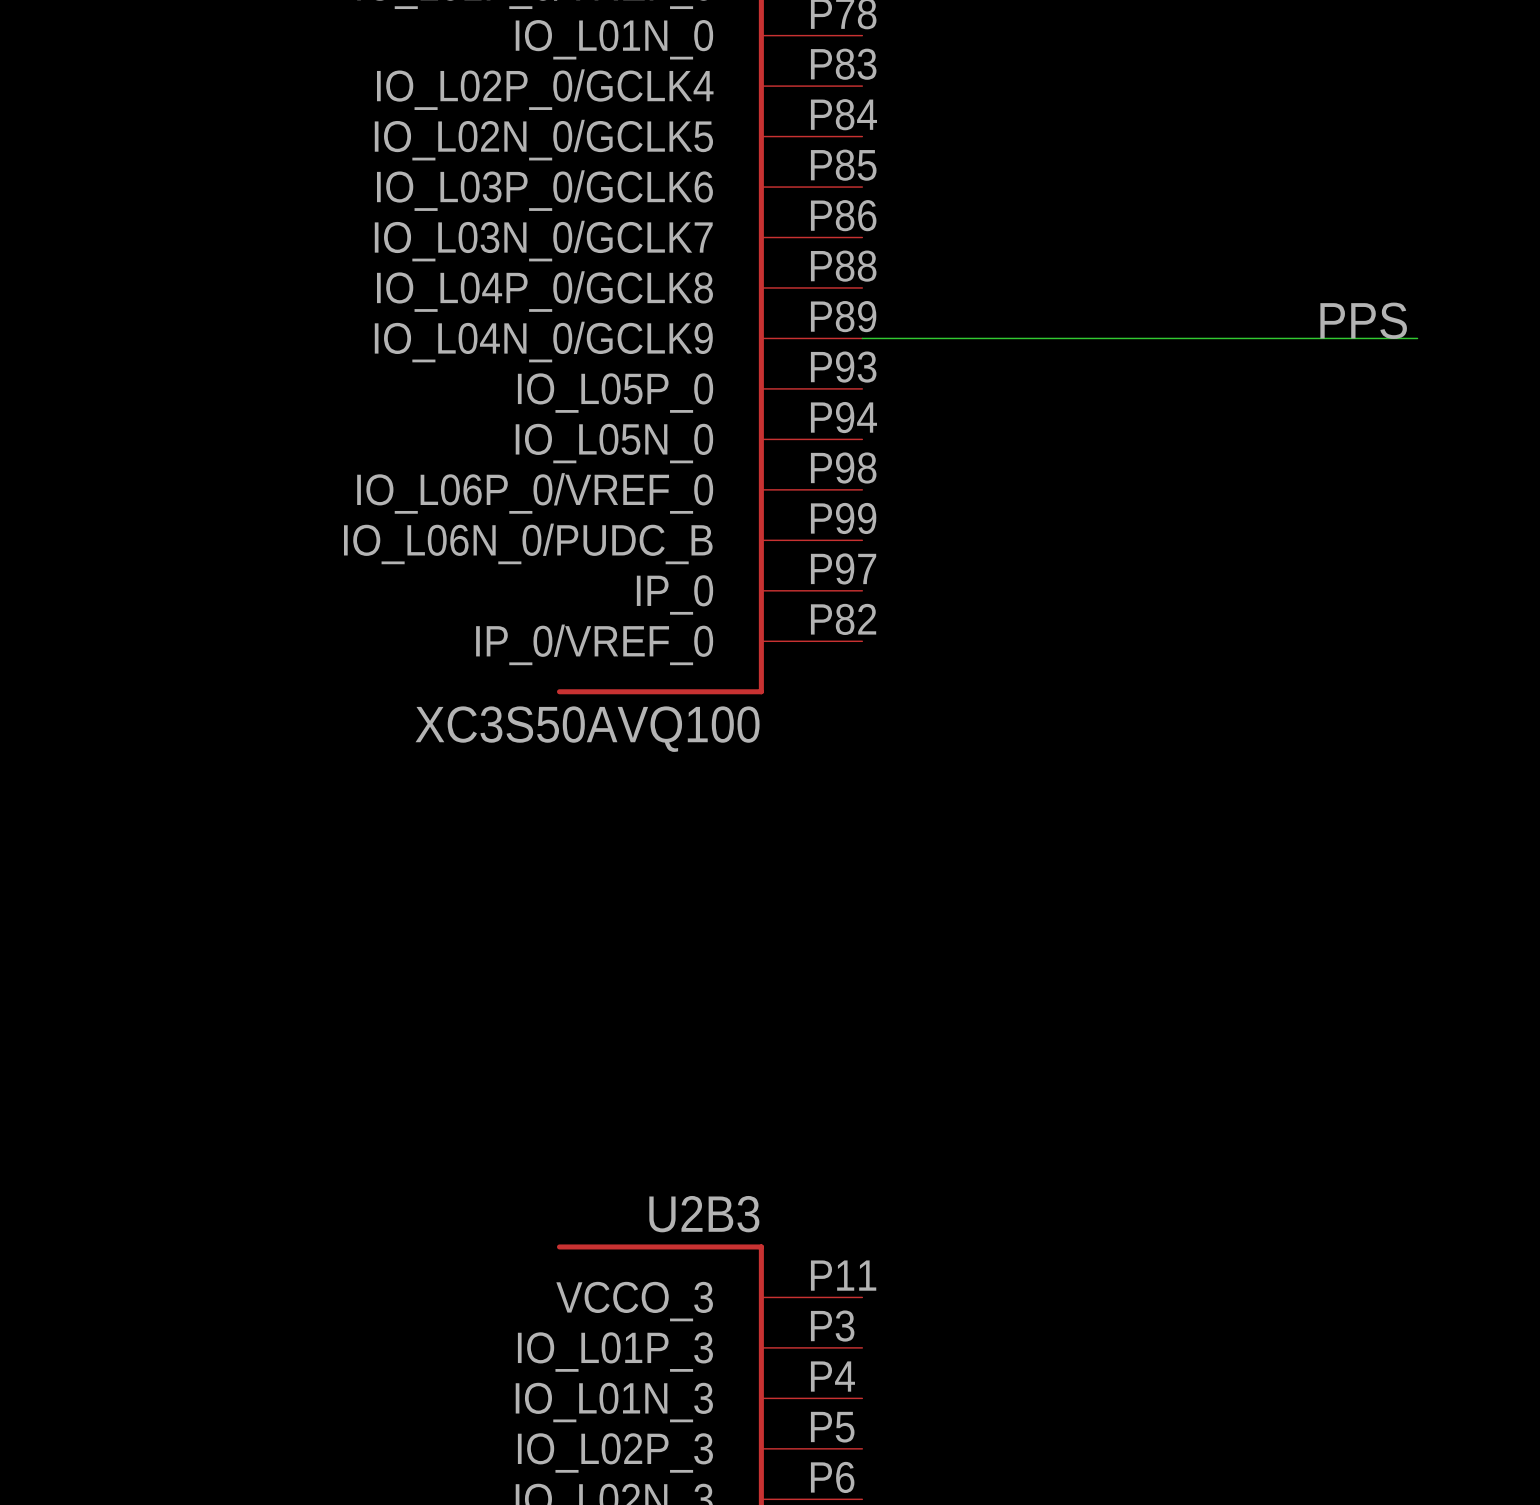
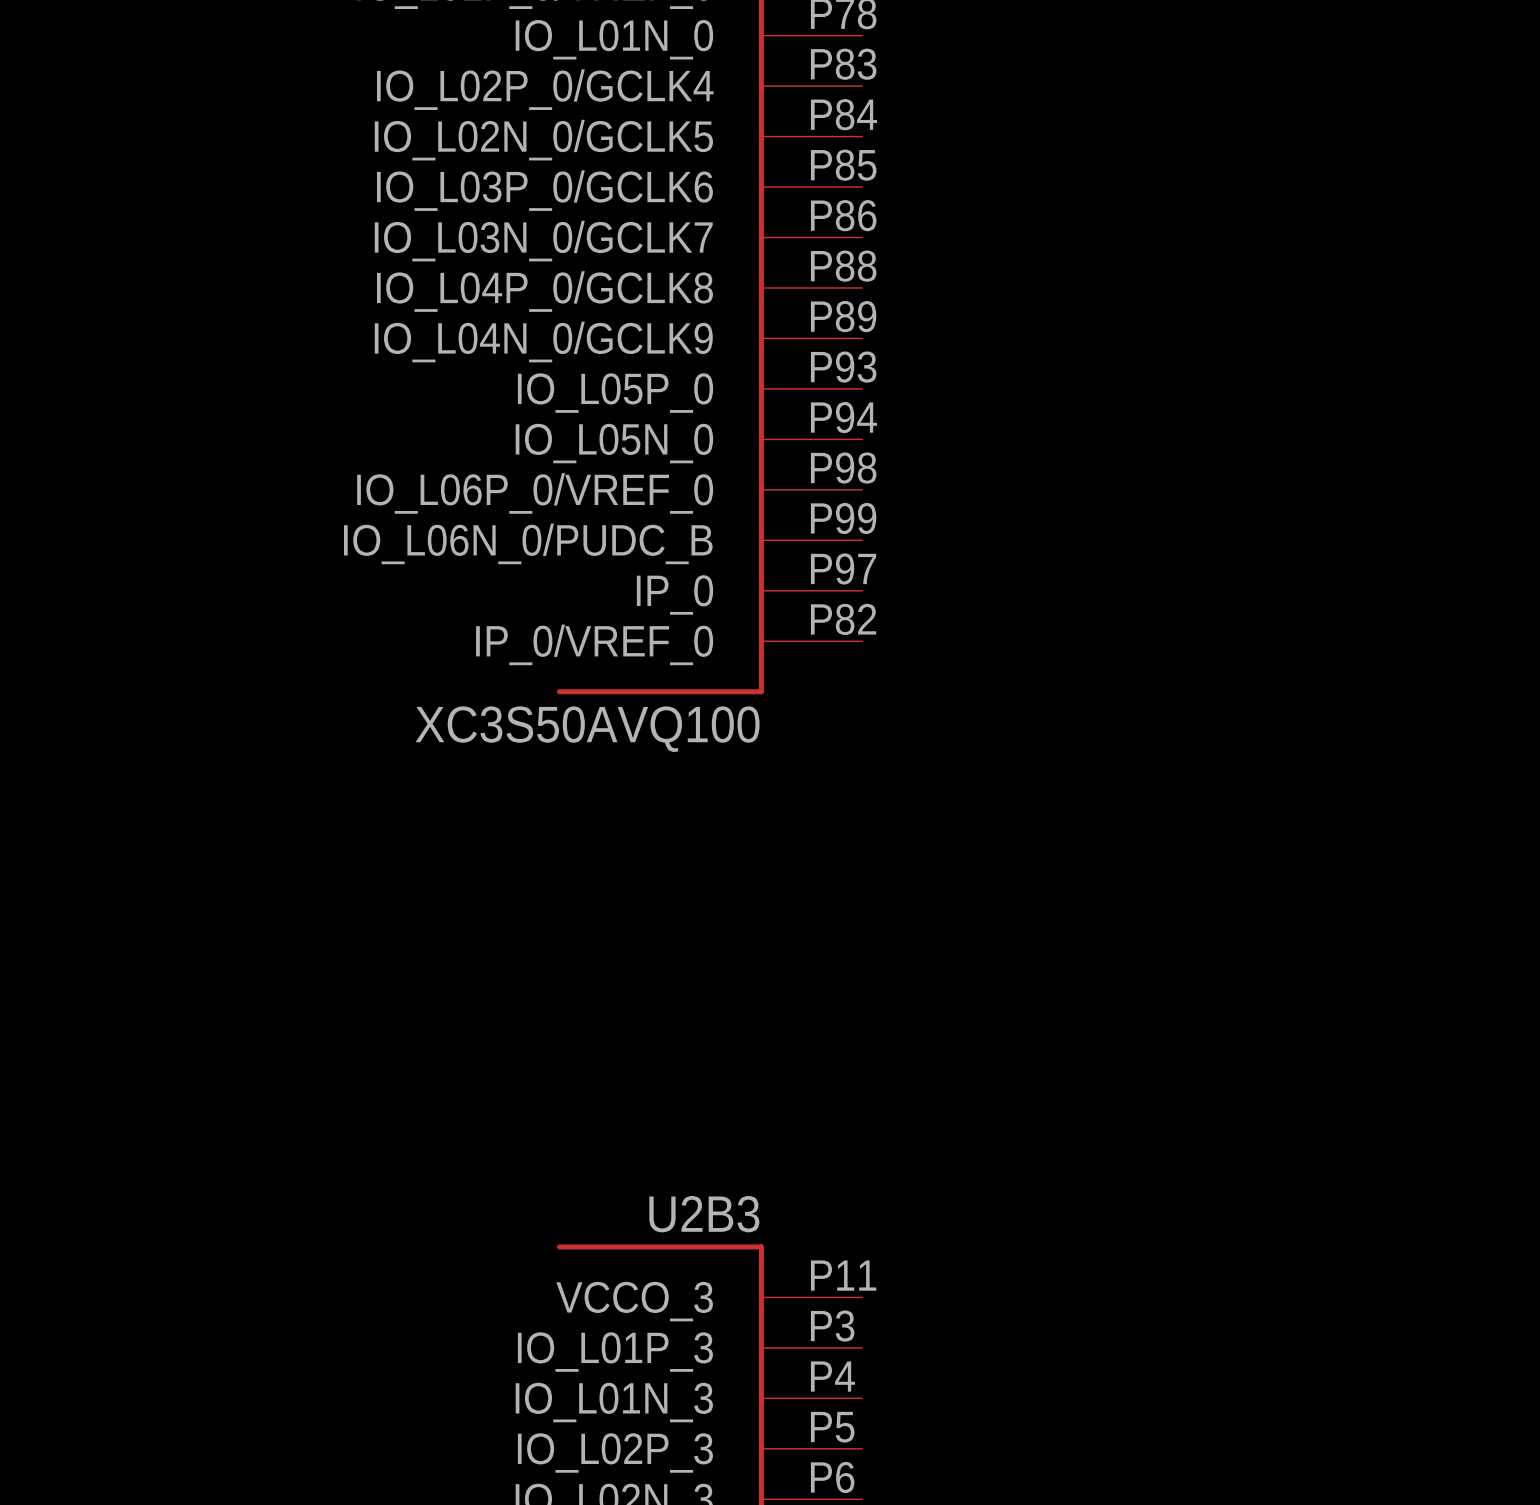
label: PPS (1363, 320) -> none
wire: (862, 338) (1417, 338) -> none

